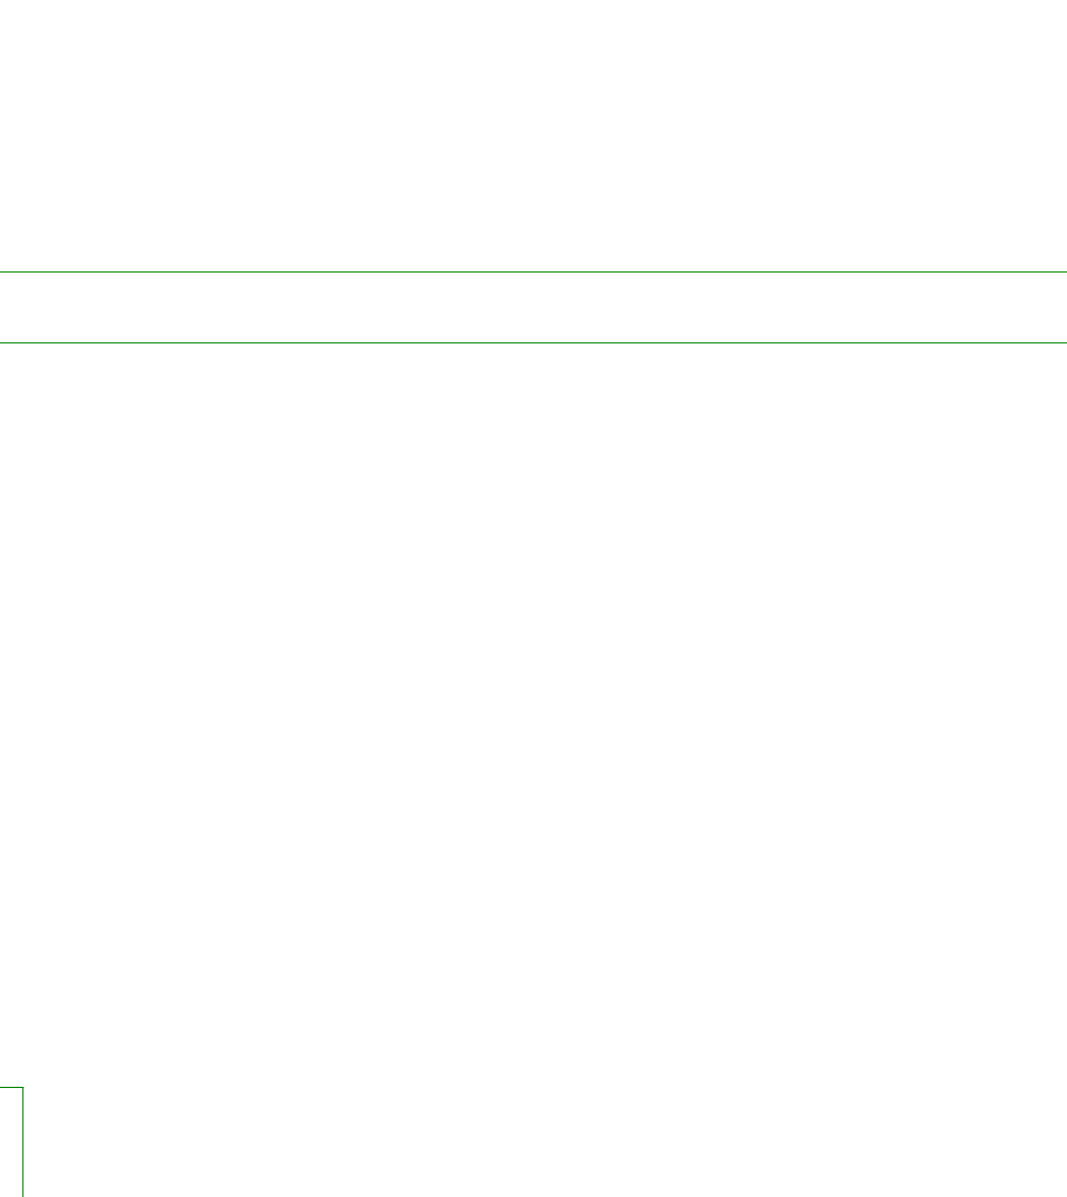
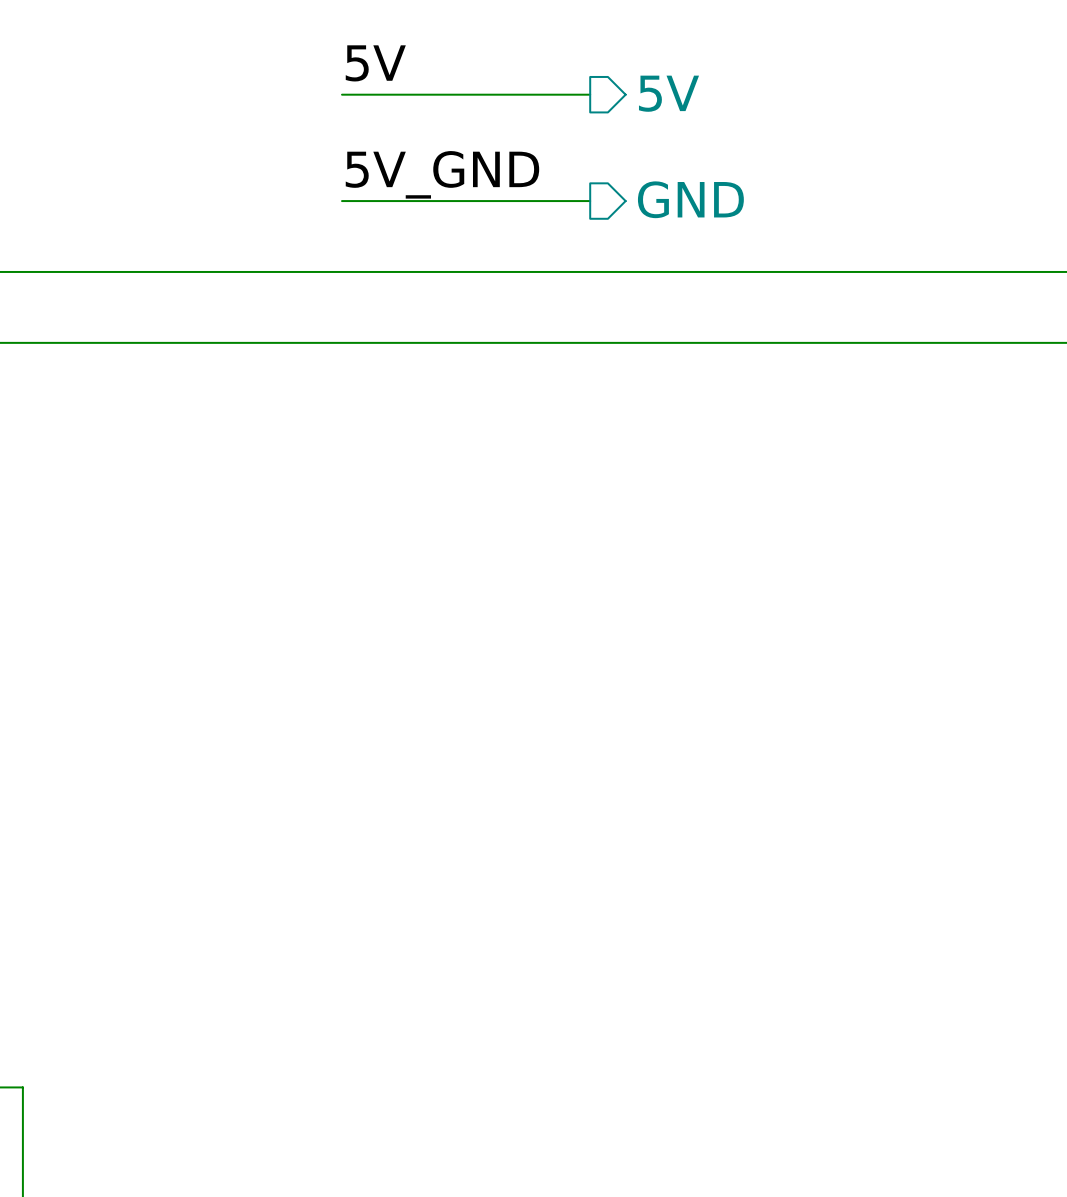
label: none -> 5V (375, 63)
sheet pin: none -> 5V (669, 93)
wire: none -> (342, 94) (590, 94)
label: none -> 5V_GND (442, 174)
sheet pin: none -> GND (690, 199)
wire: none -> (342, 201) (590, 201)

